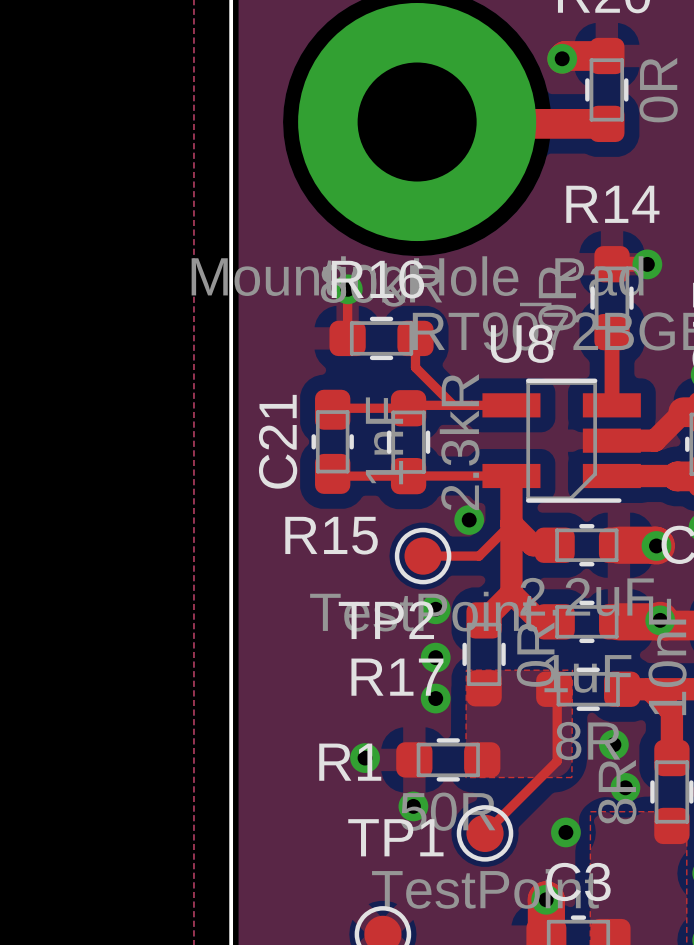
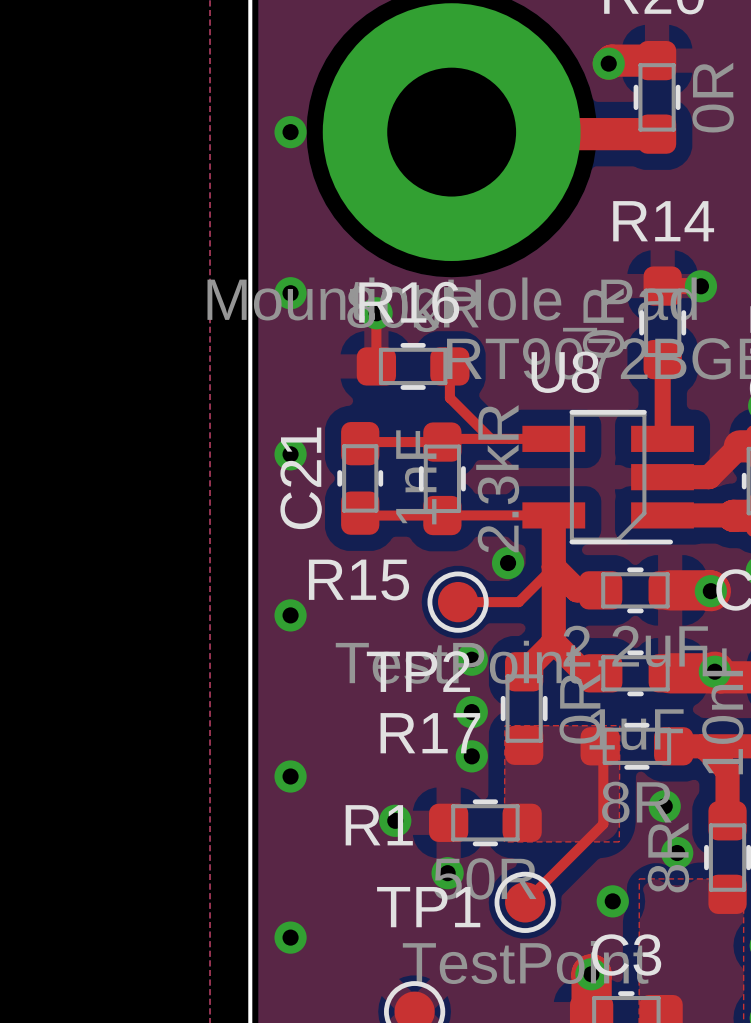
via: none -> (290, 132)
via: none -> (290, 293)
via: none -> (290, 454)
via: none -> (290, 615)
via: none -> (290, 776)
via: none -> (290, 937)

